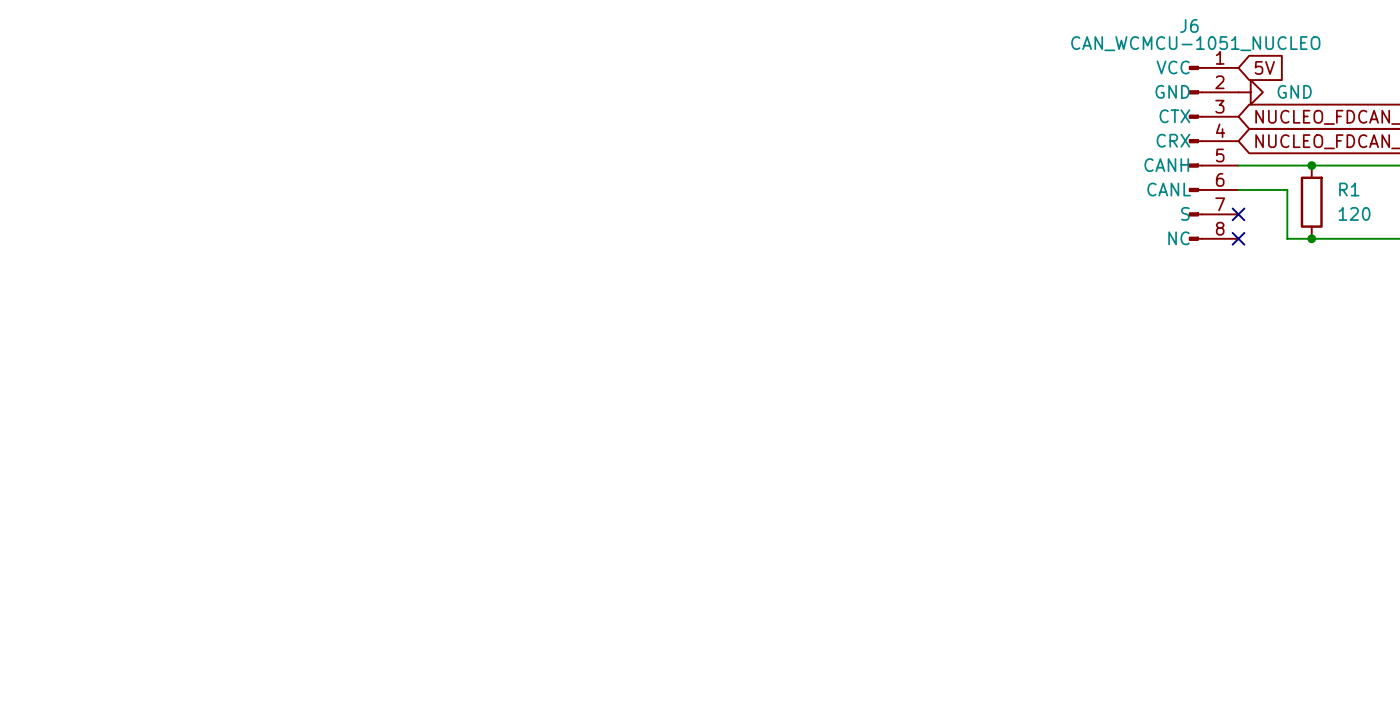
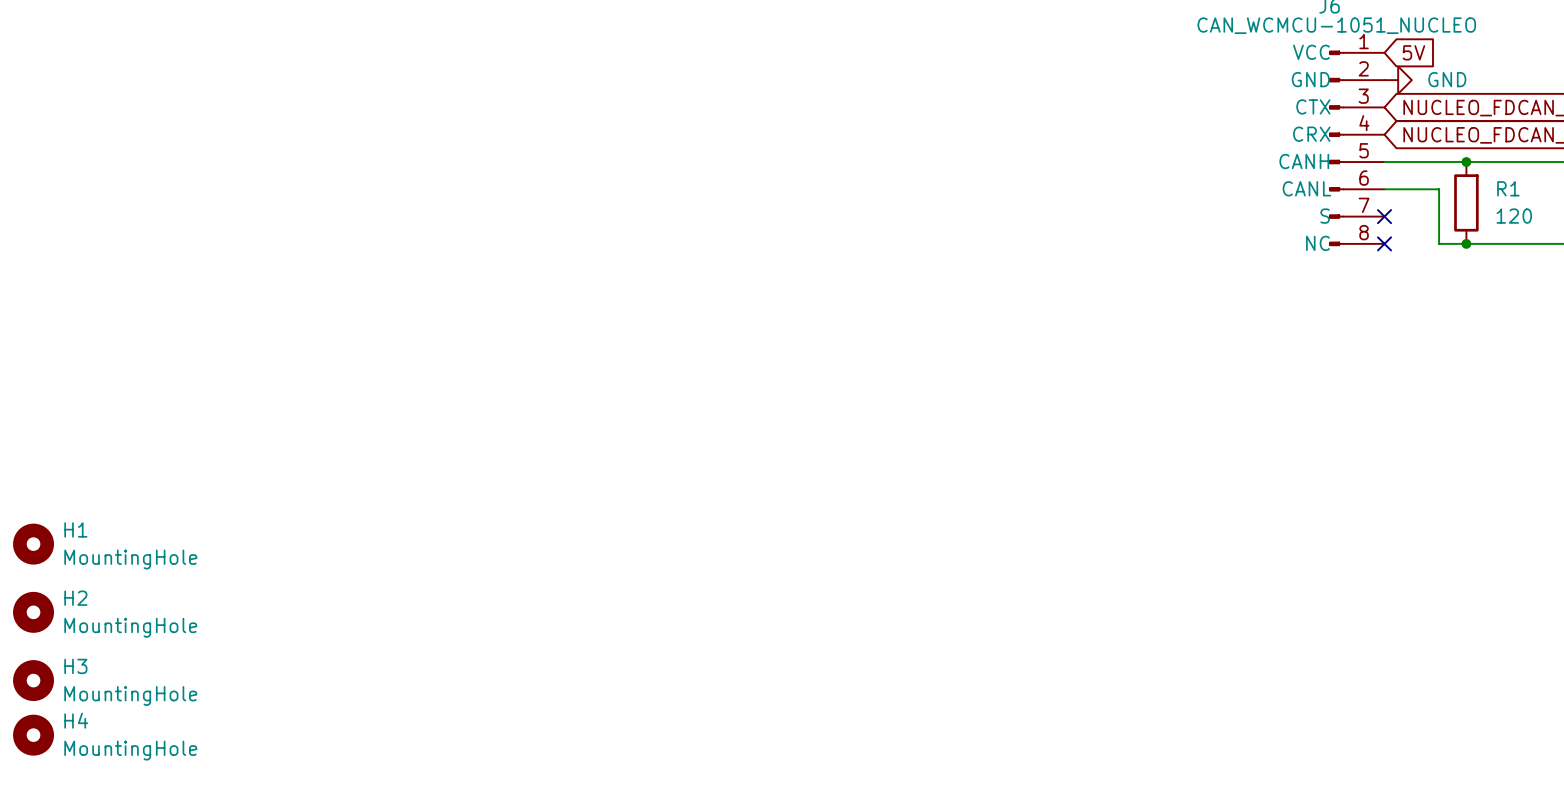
H1: none -> MountingHole (33, 544)
H2: none -> MountingHole (33, 612)
H3: none -> MountingHole (33, 680)
H4: none -> MountingHole (33, 735)

